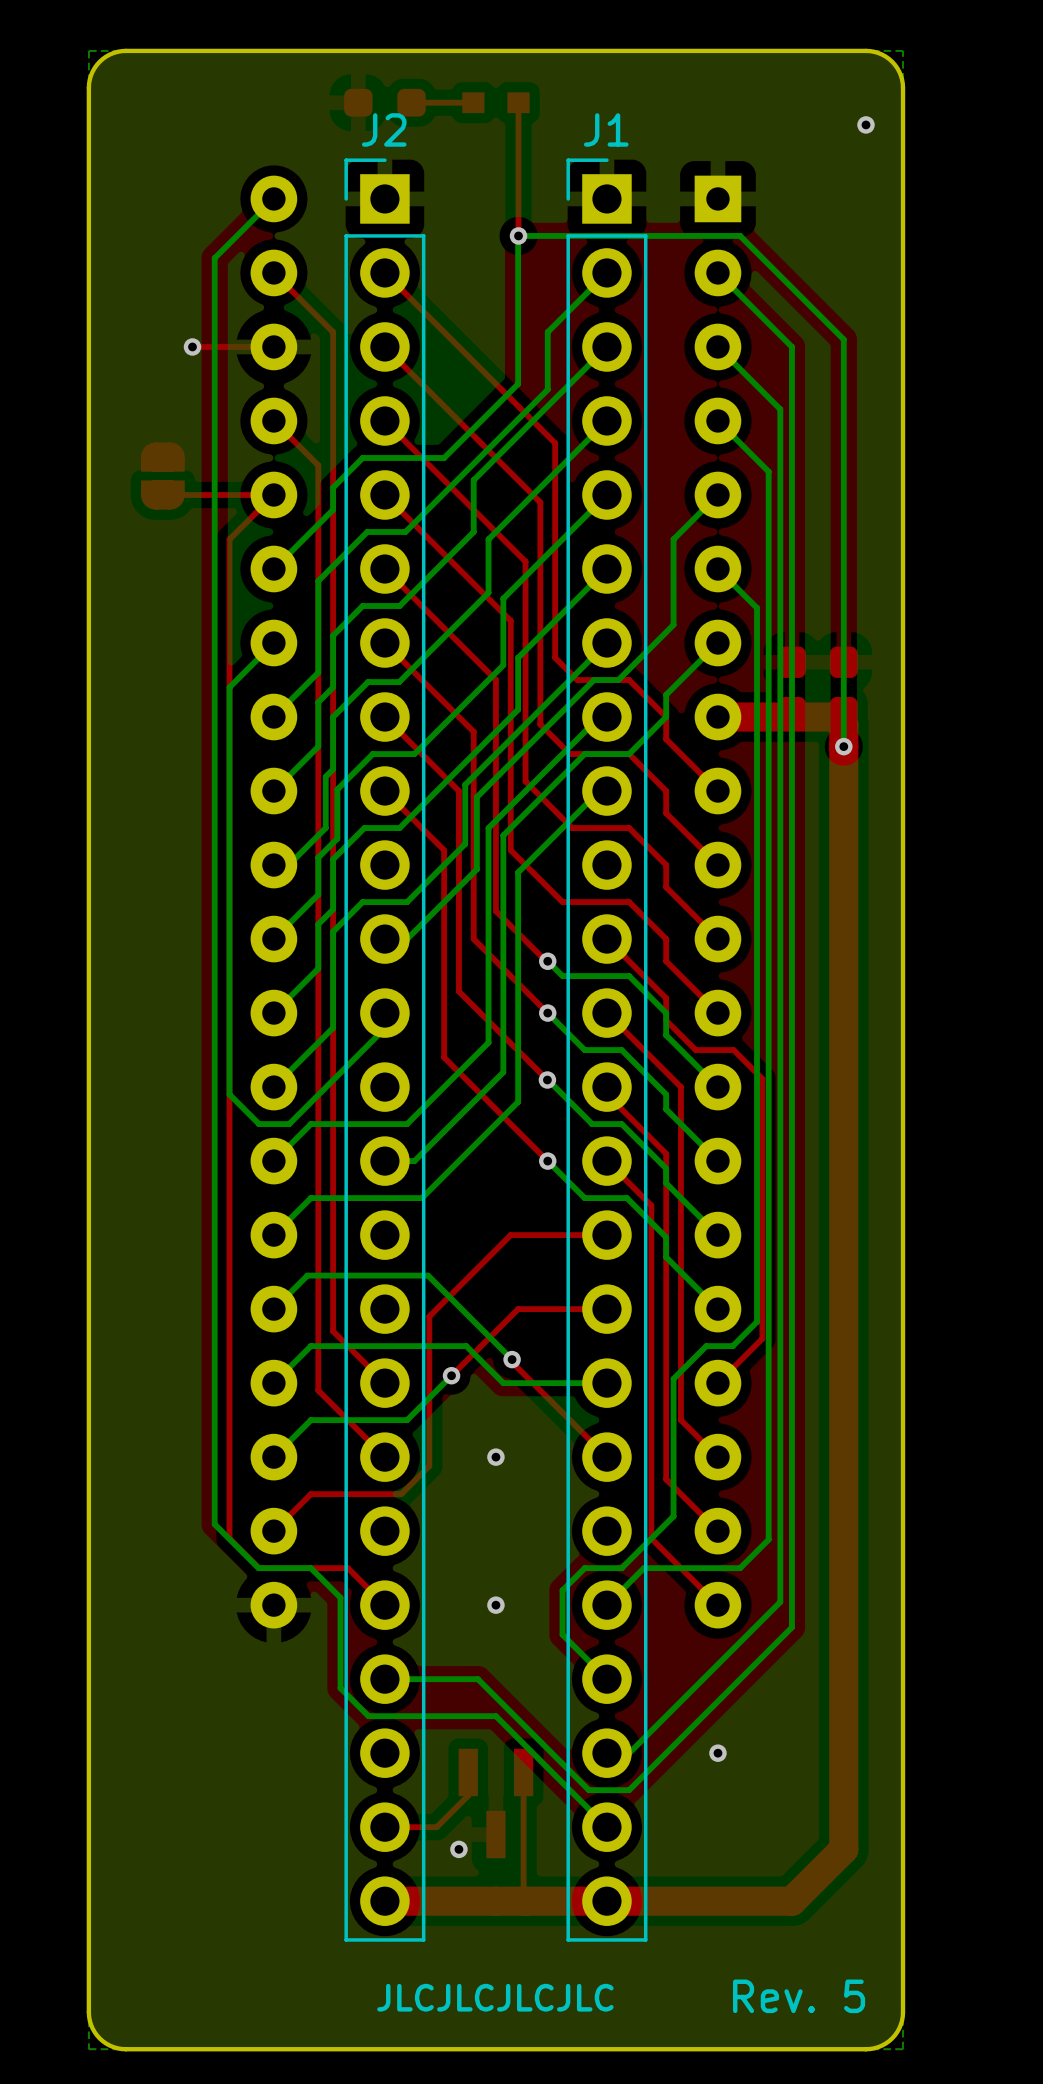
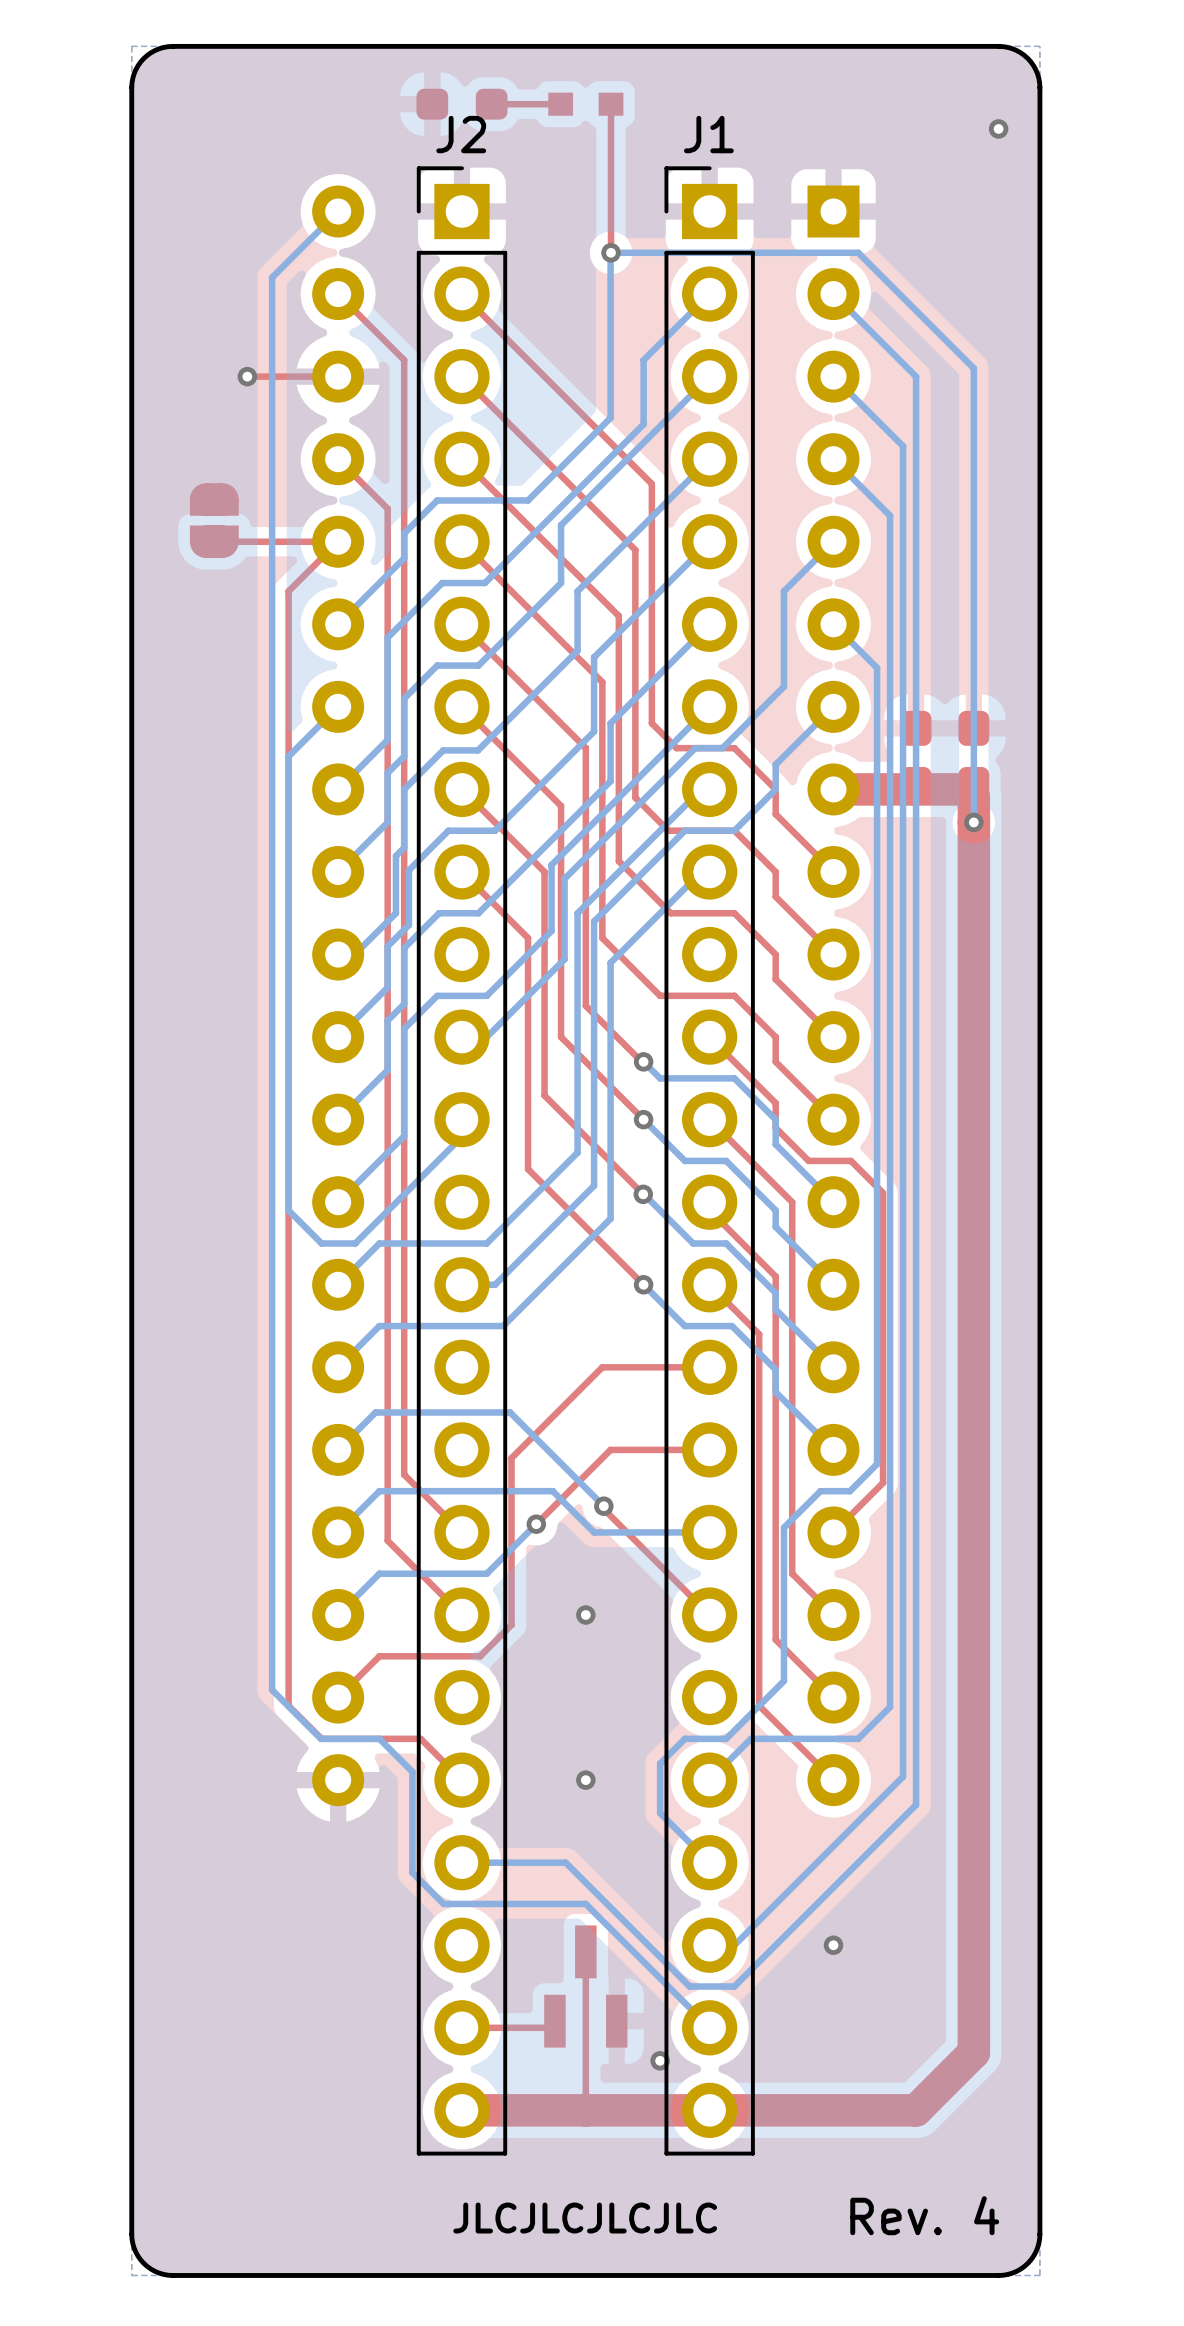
top track: none -> (585, 1951) (585, 2110)
top track: (468, 1772) (468, 1795) (436, 1827) -> (554, 2021) (548, 2027) (519, 2027)
top track: (523, 1772) (523, 1899) (525, 1901) -> none
part rotation: 0° (495, 1803) -> 180° (585, 1986)
via position: (458, 1849) -> (660, 2060)
text: Rev. 5 (799, 1996) -> Rev. 4 (924, 2215)

